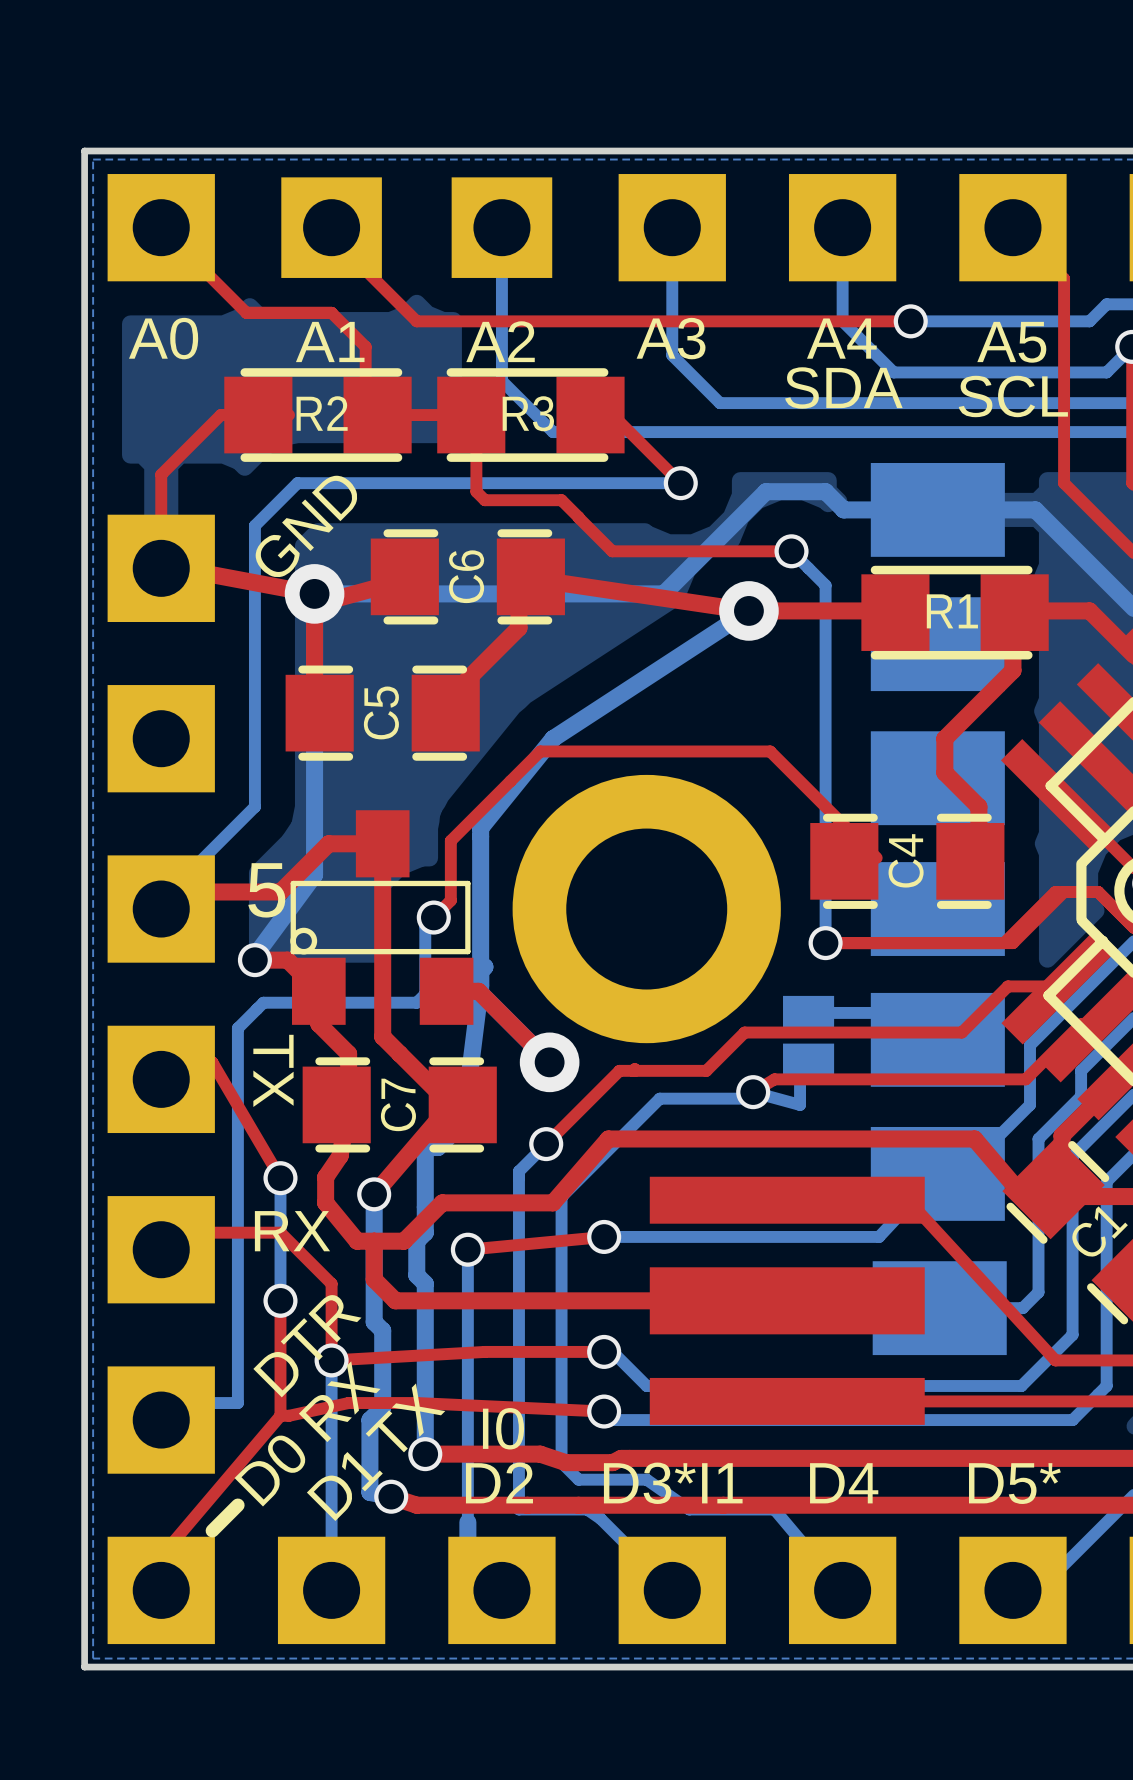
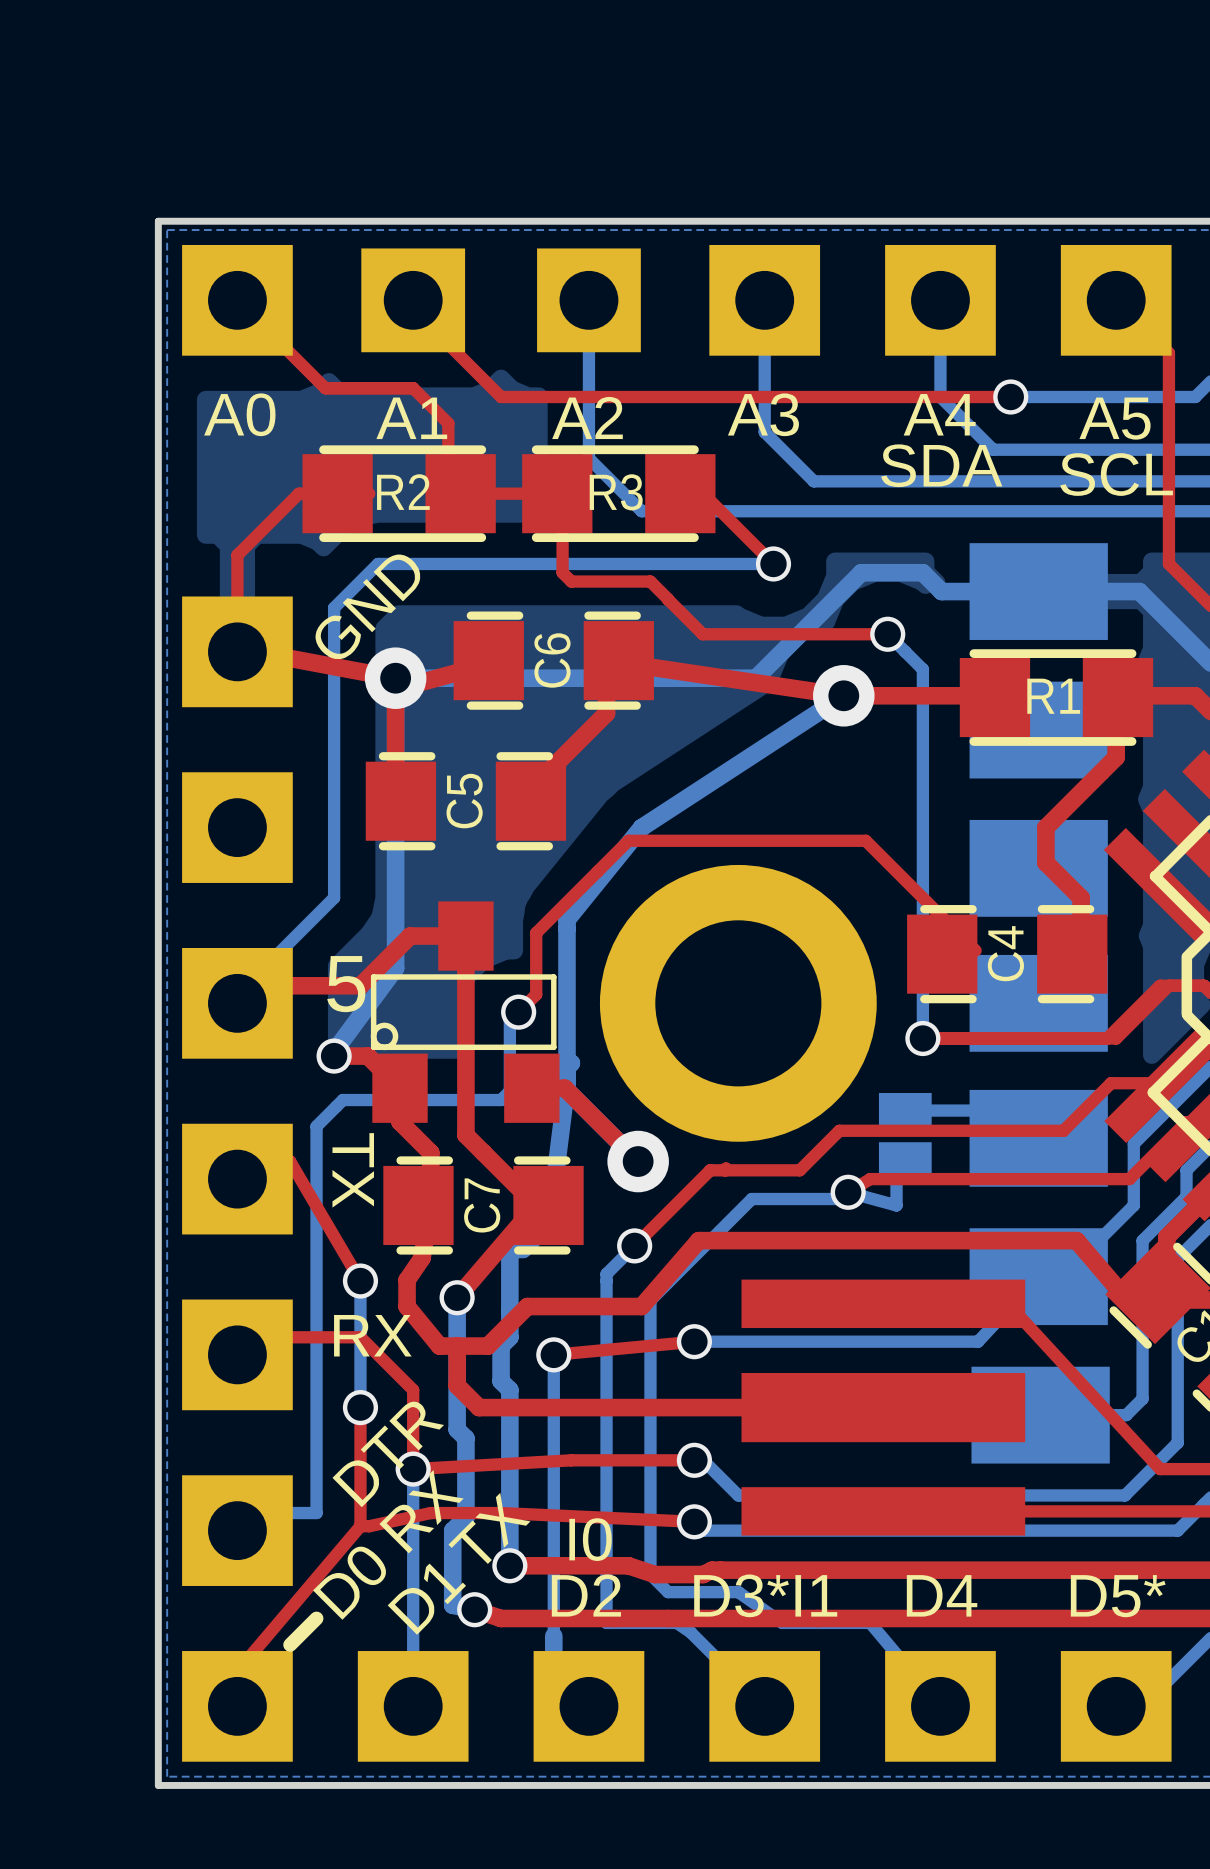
text position: GND (306, 526) -> GND (368, 607)

